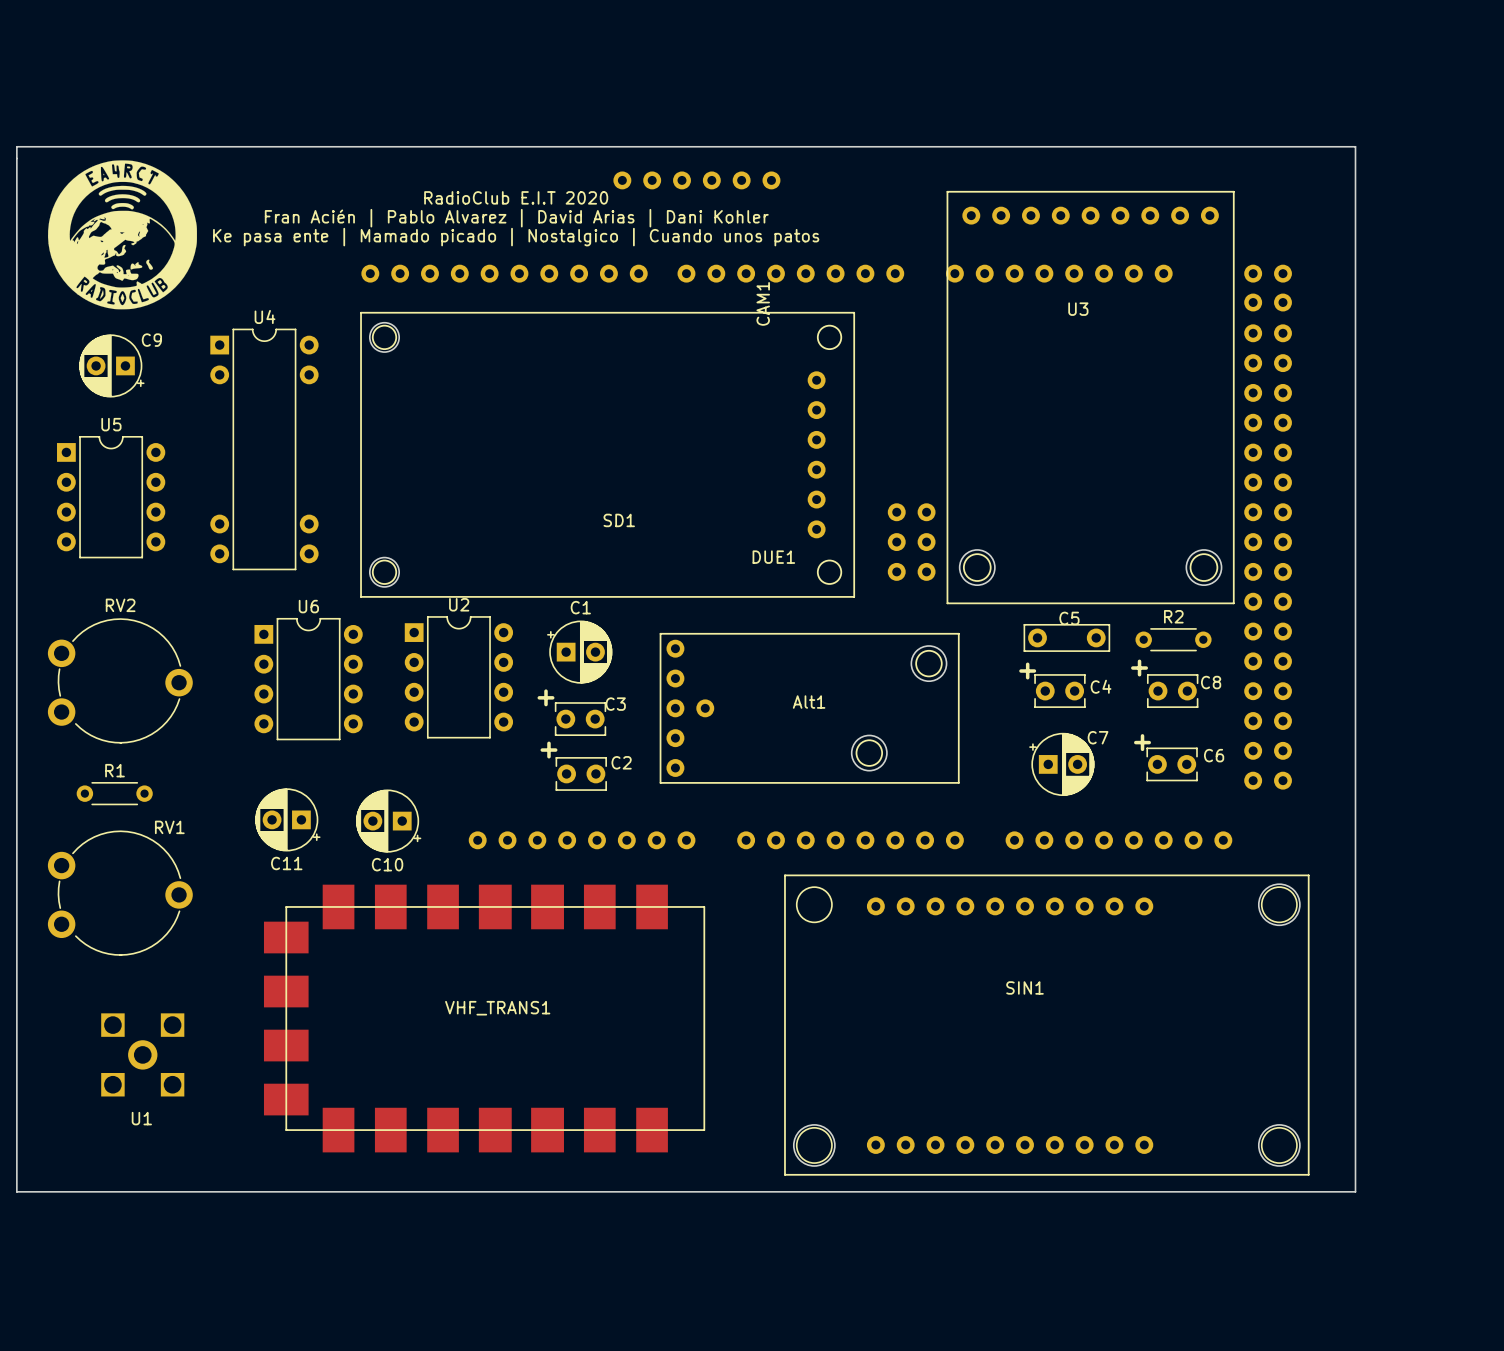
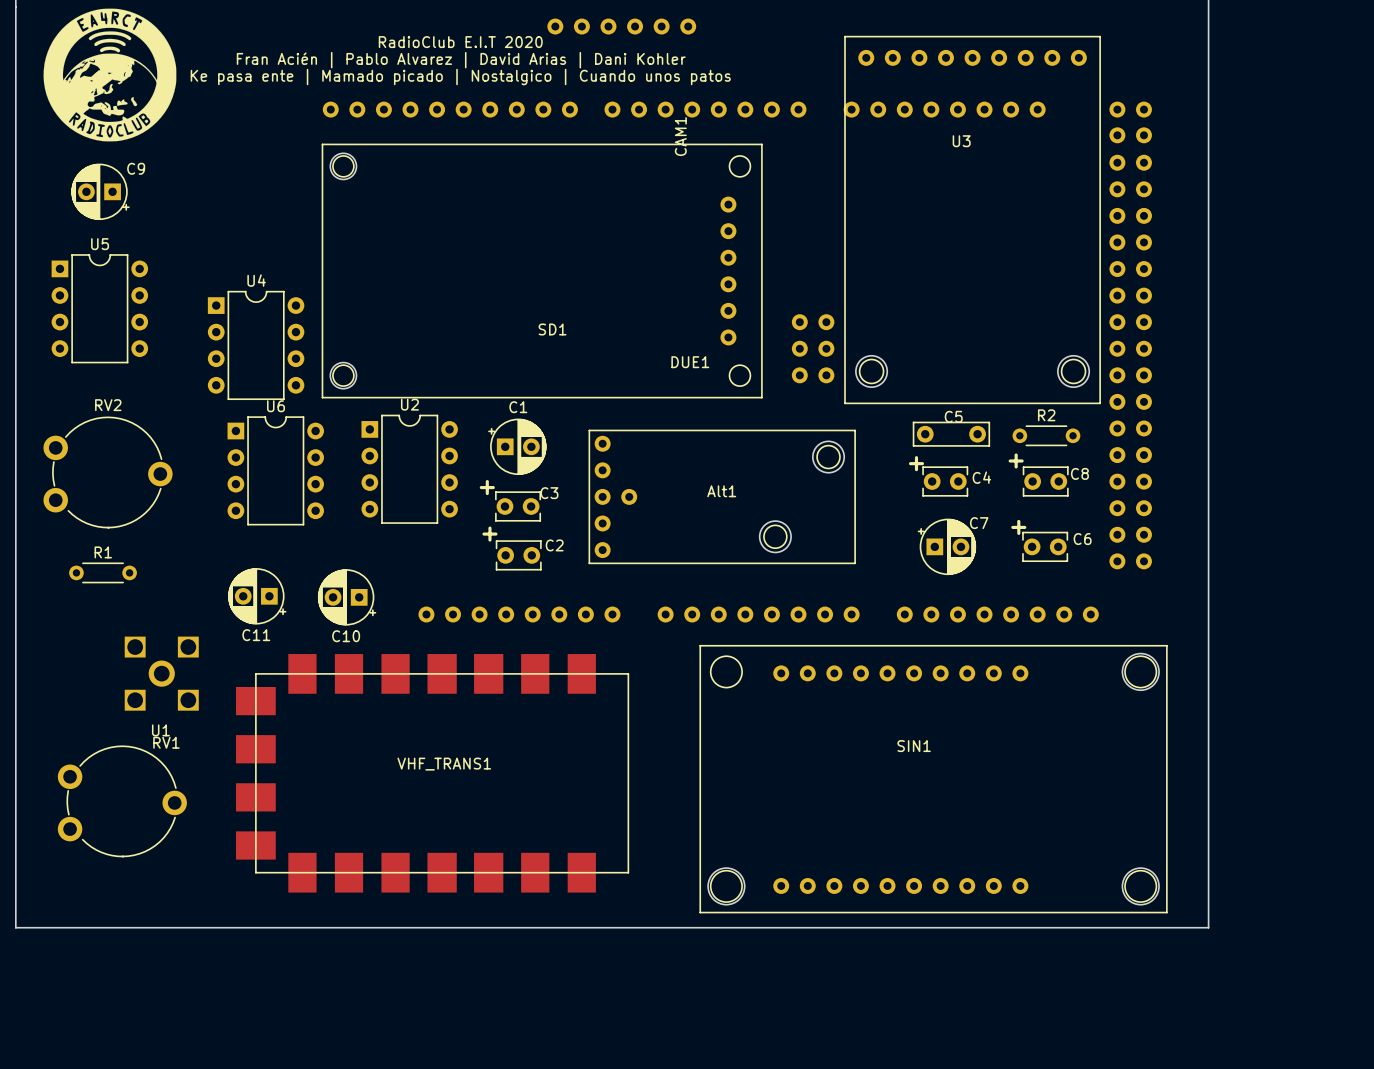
U4 name position: U4 (265, 316) -> U4 (256, 280)
U4 footprint: [210, 328, 319, 571] -> [207, 291, 305, 400]
RV1 position: (120, 893) -> (122, 801)
U1 position: (142, 1054) -> (161, 673)

